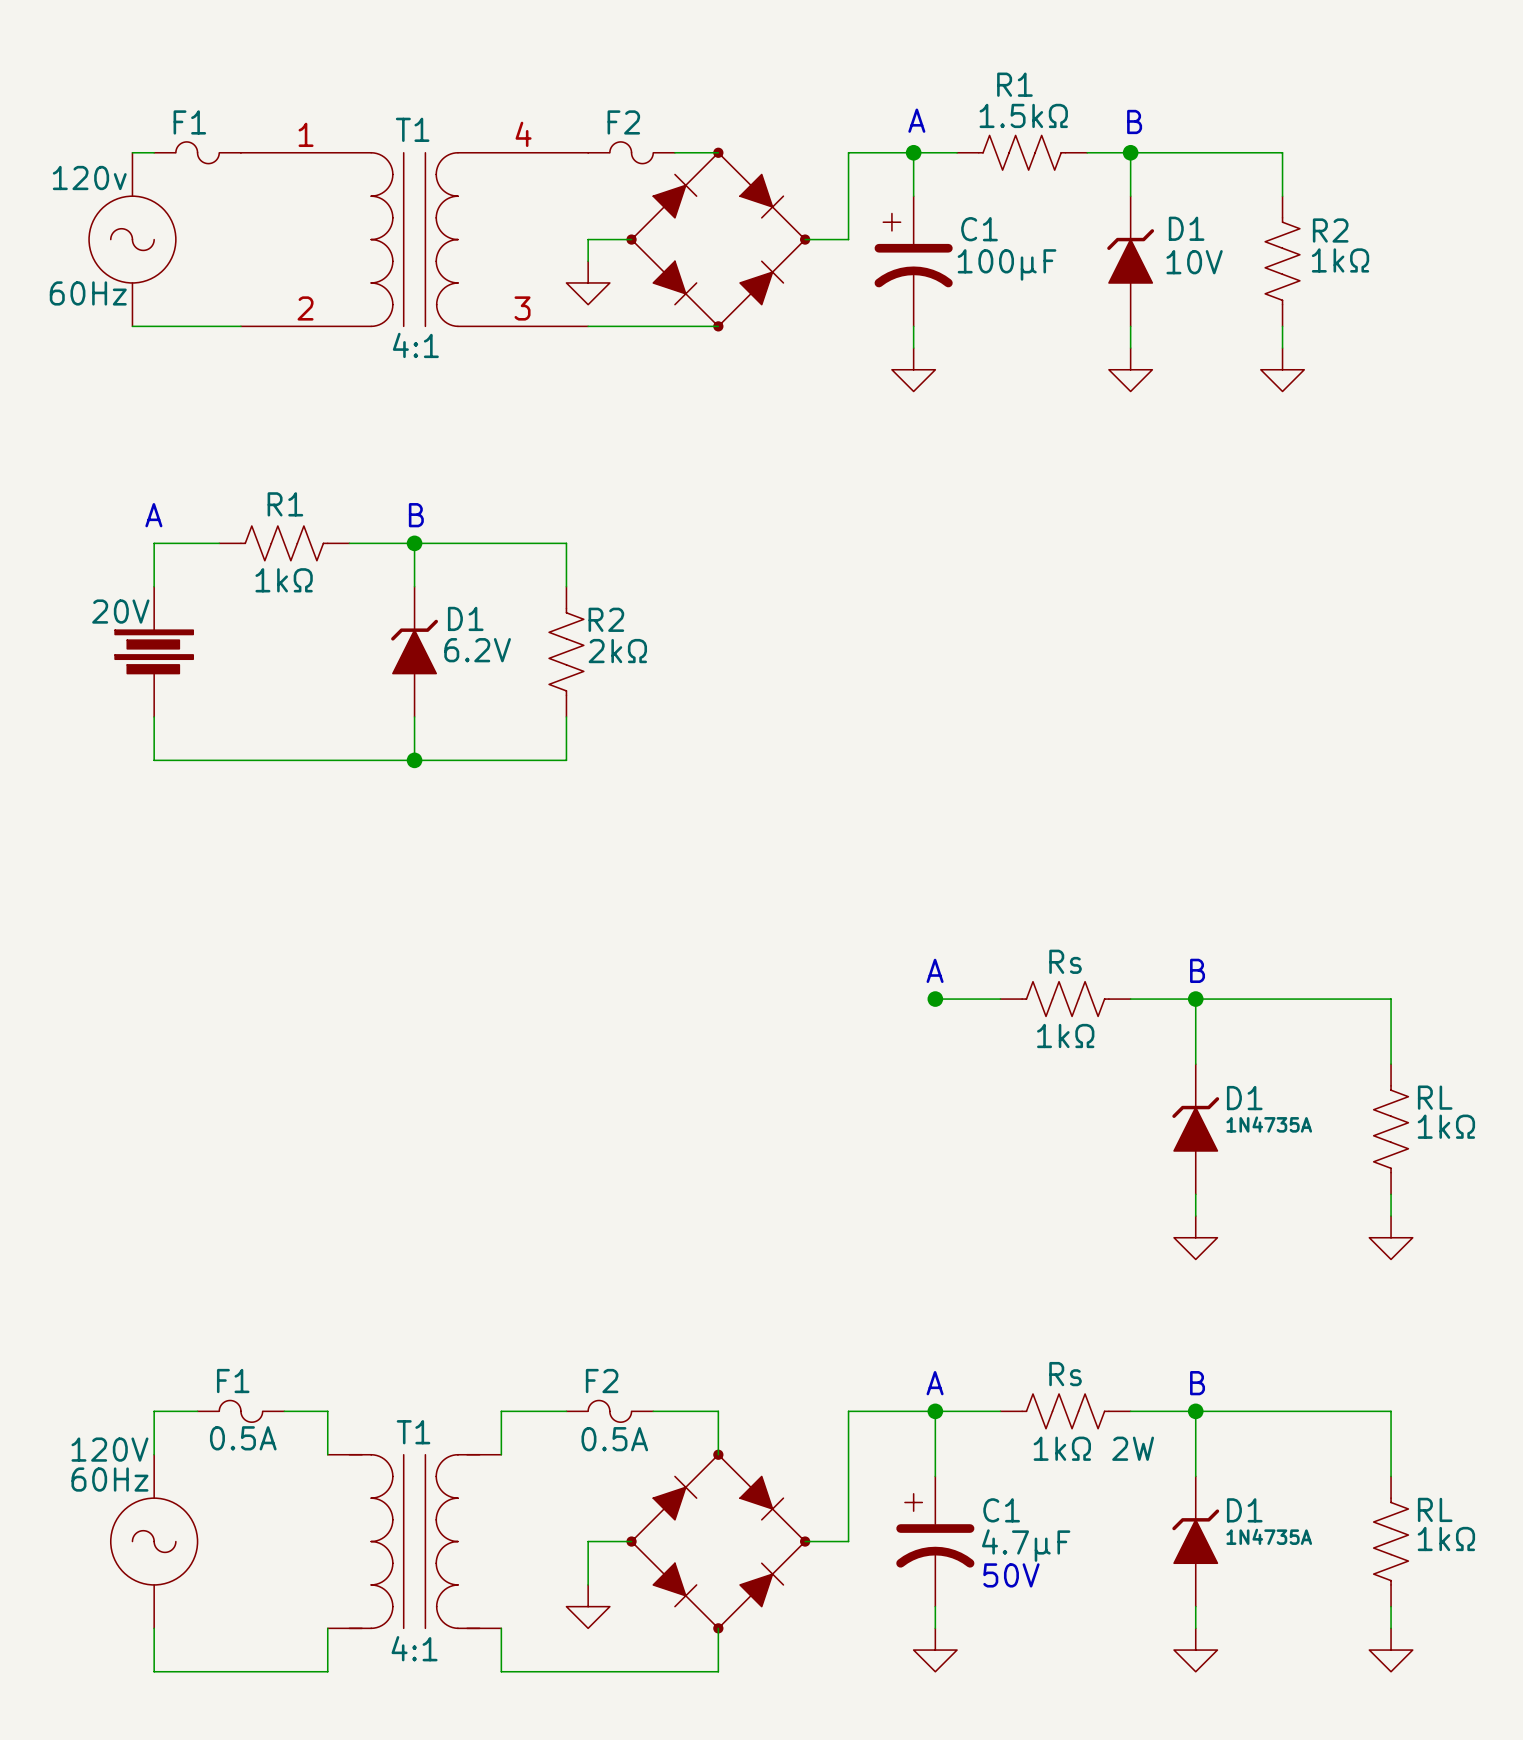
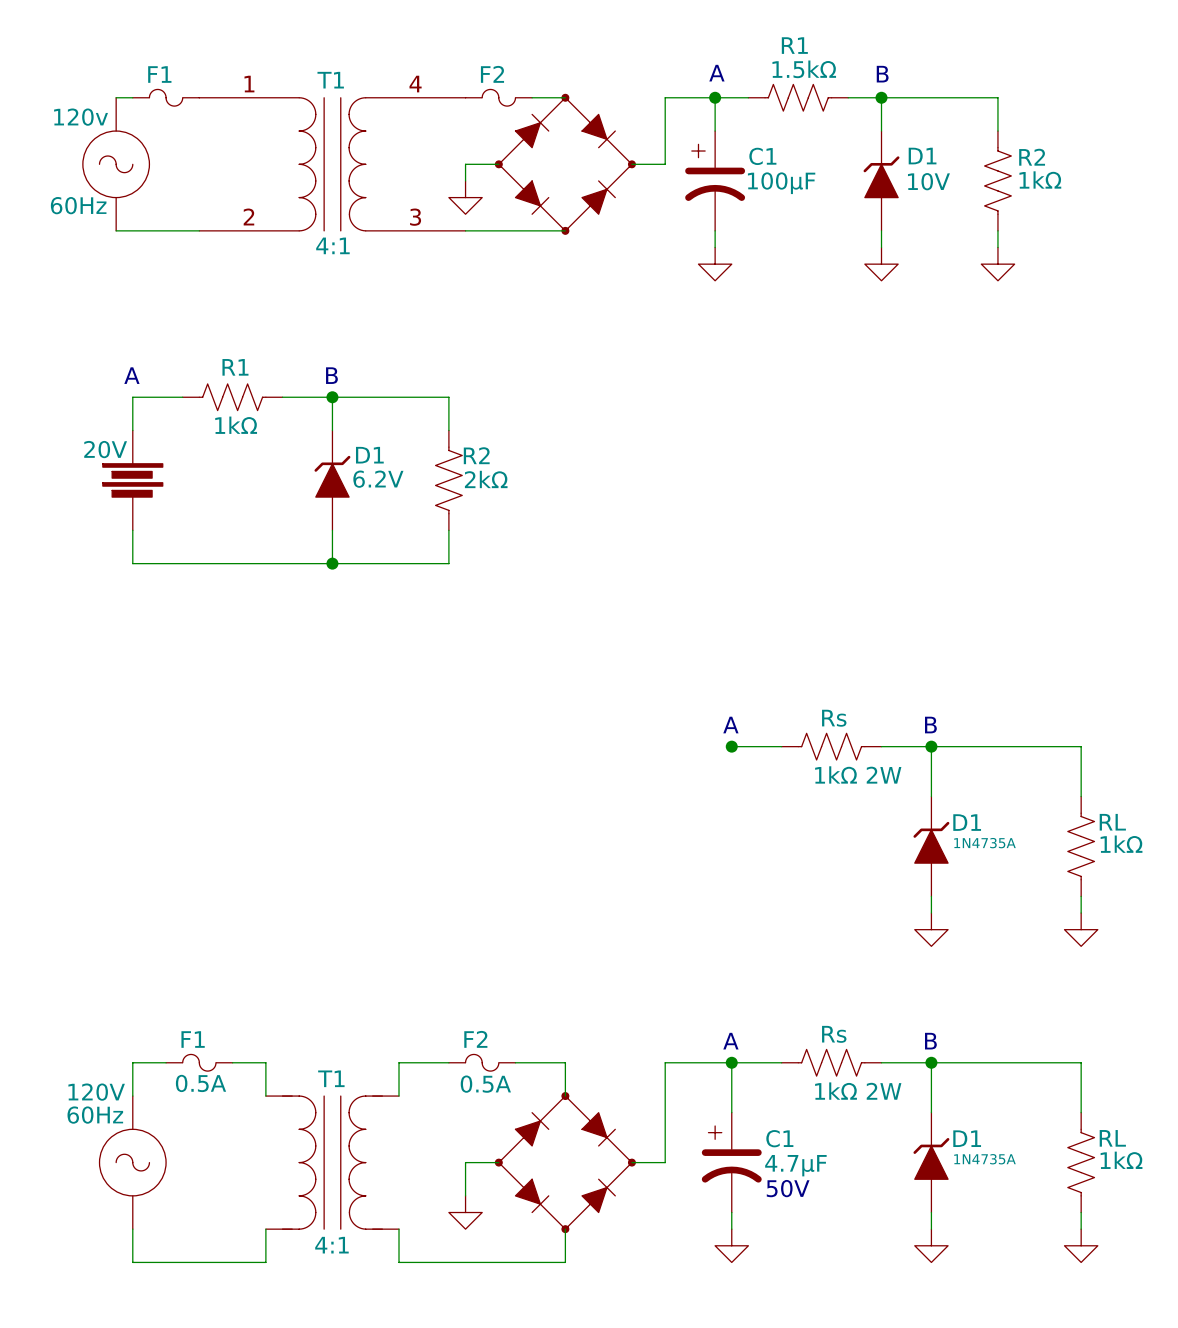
Rs value: 1kΩ (1065, 1036) -> 1kΩ 2W (858, 774)

